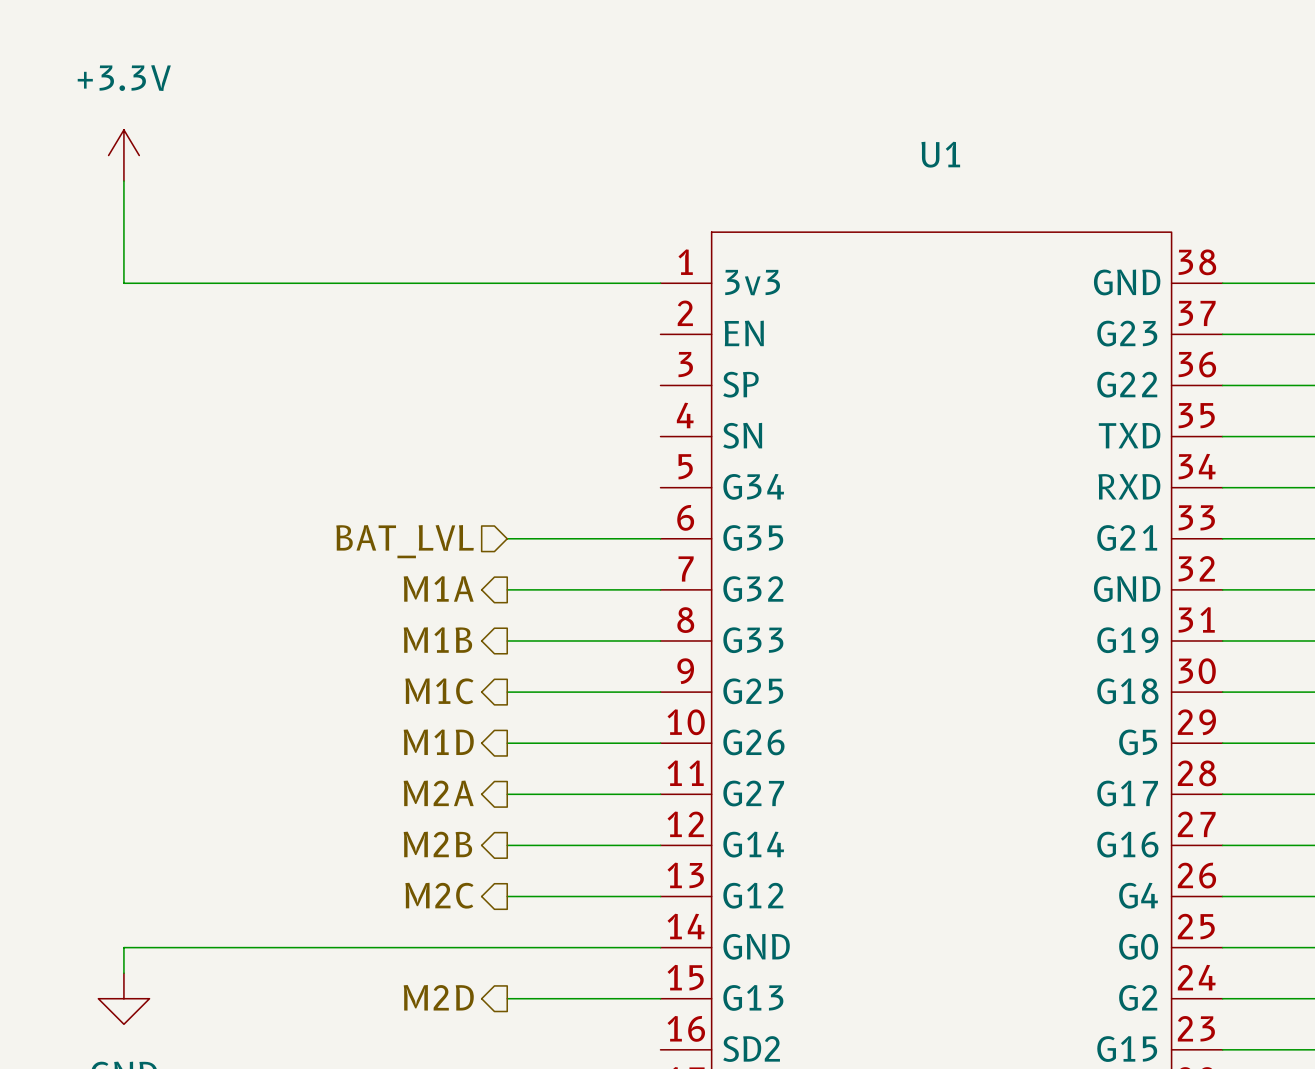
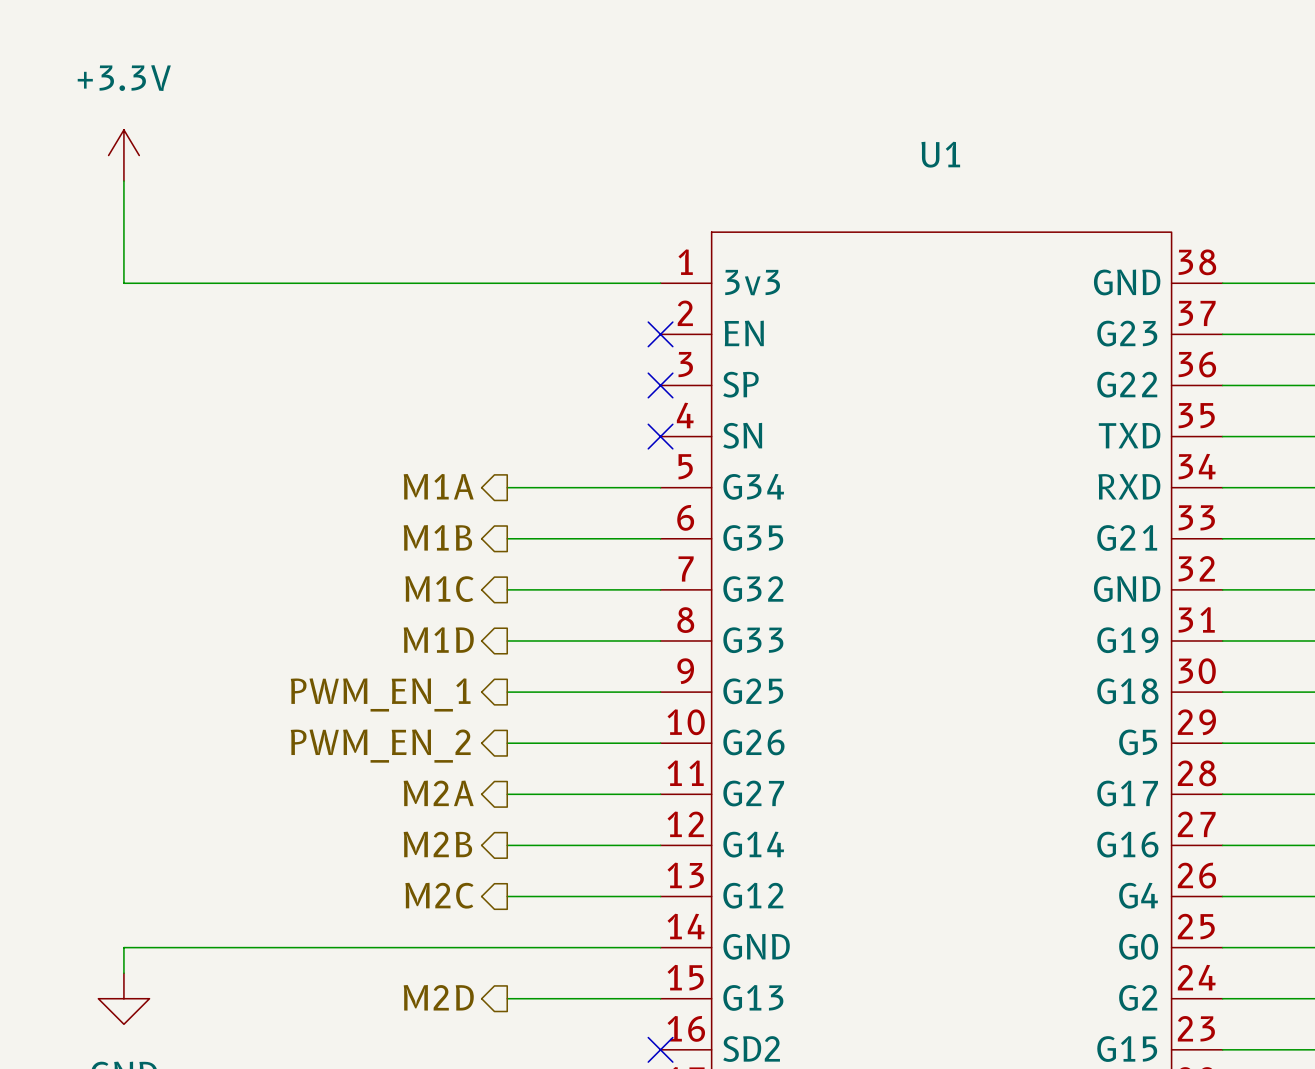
no-connect mark: none -> (660, 334)
no-connect mark: none -> (660, 385)
no-connect mark: none -> (660, 436)
hierarchical label: none -> M1A (438, 486)
wire: none -> (507, 487) (660, 487)
hierarchical label shape: input (405, 541) -> output (437, 537)
hierarchical label: BAT_LVL (405, 541) -> M1B (437, 537)
hierarchical label: M1A (438, 588) -> M1C (439, 589)
hierarchical label: M1B (437, 640) -> M1D (438, 640)
hierarchical label: M1C (439, 691) -> PWM_EN_1 (380, 694)
hierarchical label: M1D (438, 742) -> PWM_EN_2 (380, 746)
no-connect mark: none -> (660, 1049)

